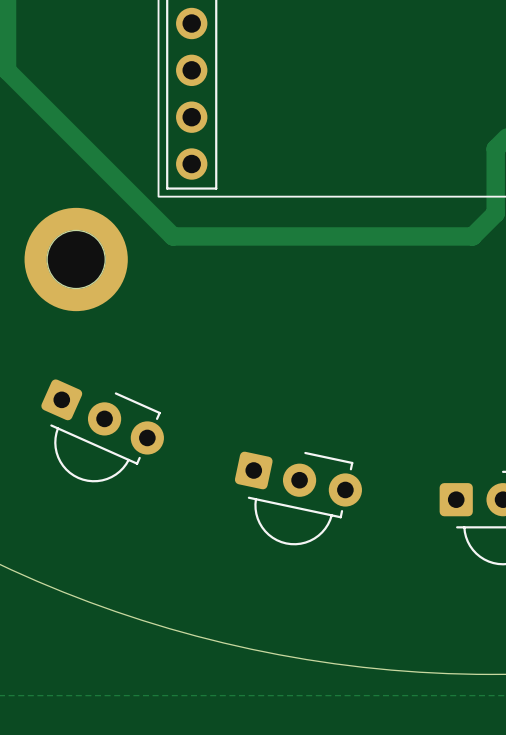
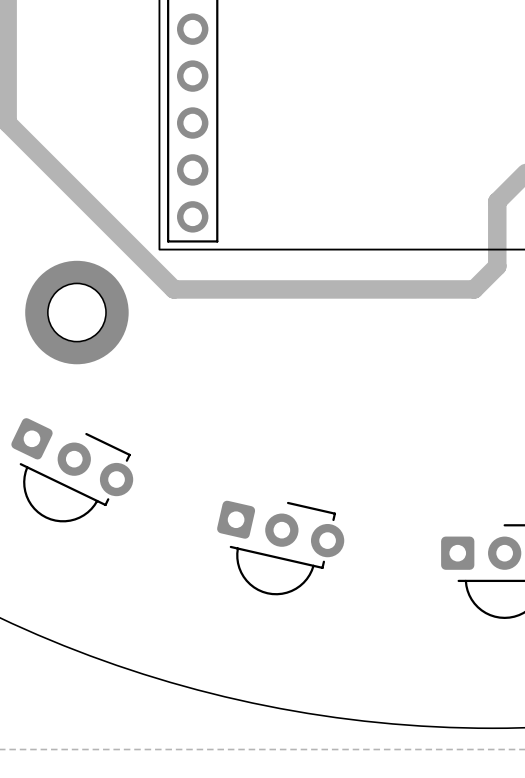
part: none -> (72, 470)
part: (102, 430) -> none
part: none -> (280, 548)
part: (298, 498) -> none

